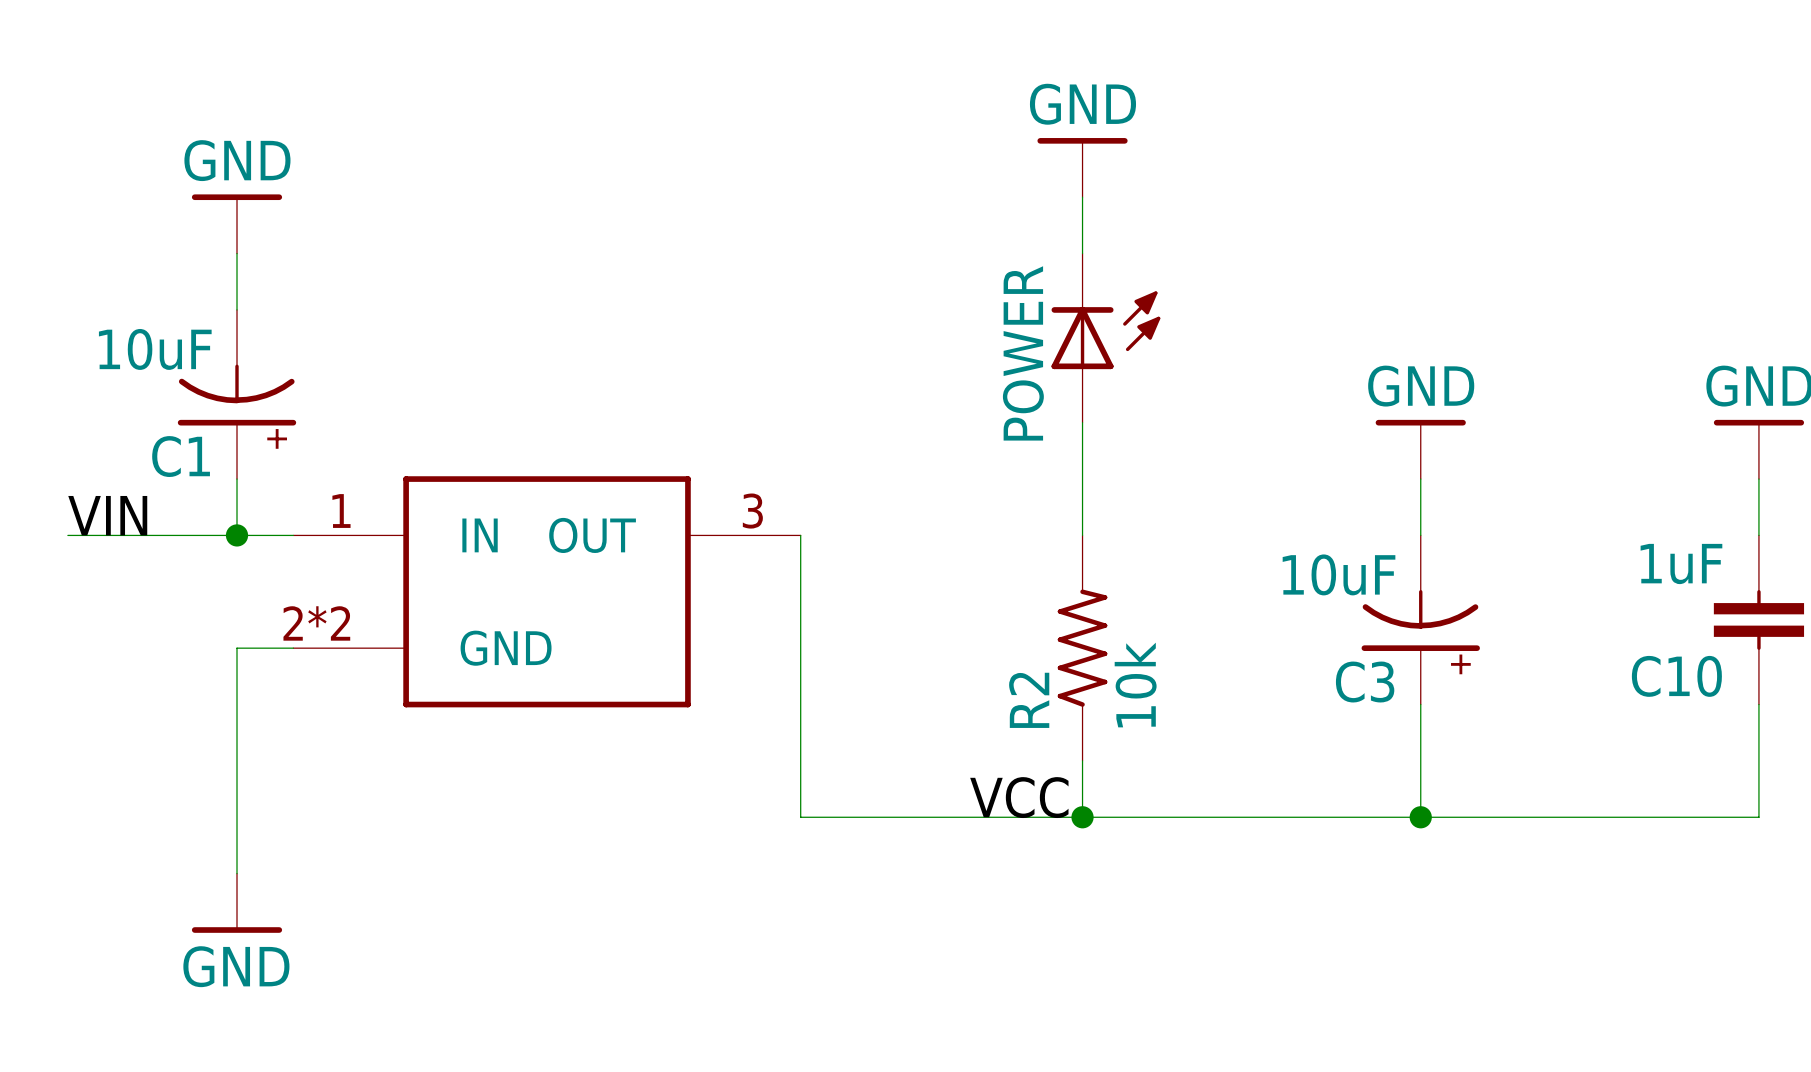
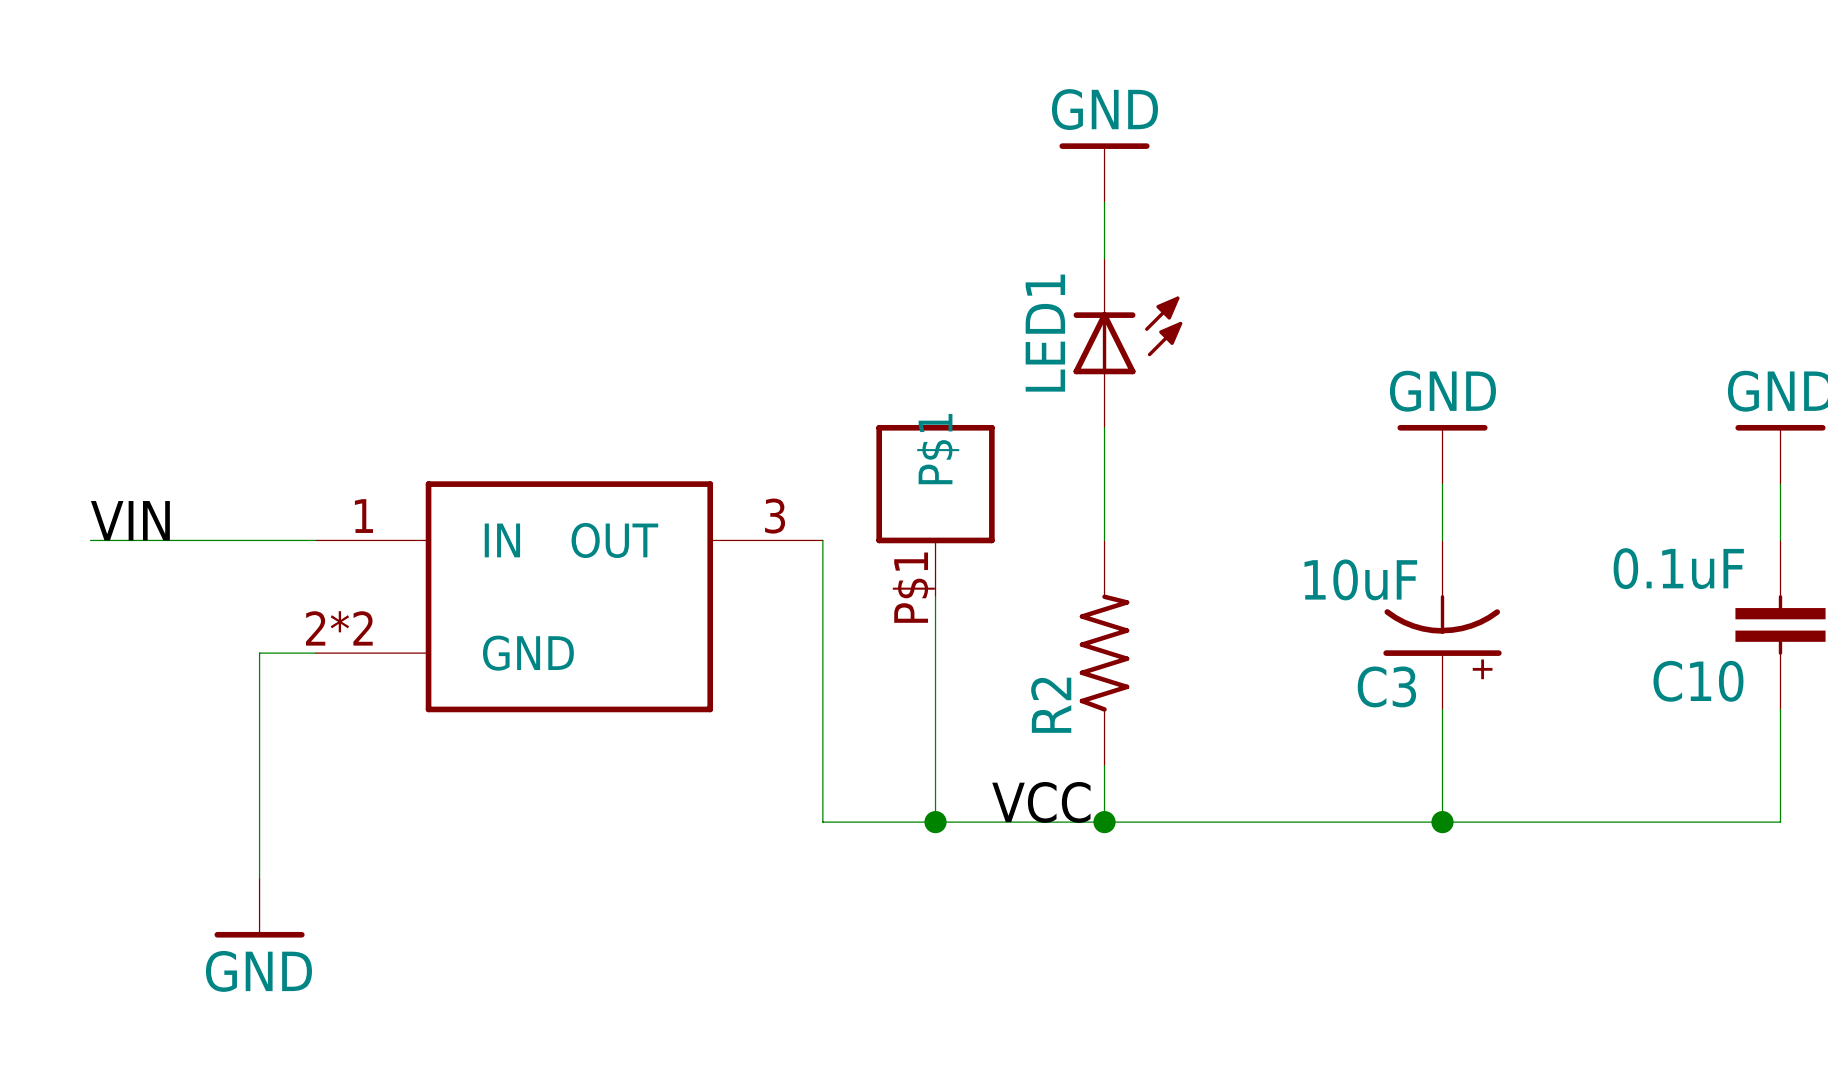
power symbol: GND (237, 223) -> none
wire: (237, 253) (237, 309) -> none
POWER name: POWER (1023, 353) -> LED1 (1045, 333)
C1: 10uF (237, 394) -> none
wire: (237, 479) (237, 535) -> none
part: none -> (935, 510)
junction: (237, 535) -> none
C10 value: 1uF (1681, 563) -> 0.1uF (1678, 568)
wire: none -> (935, 596) (935, 822)
R2 value: 10k (1135, 685) -> none
junction: none -> (935, 822)

